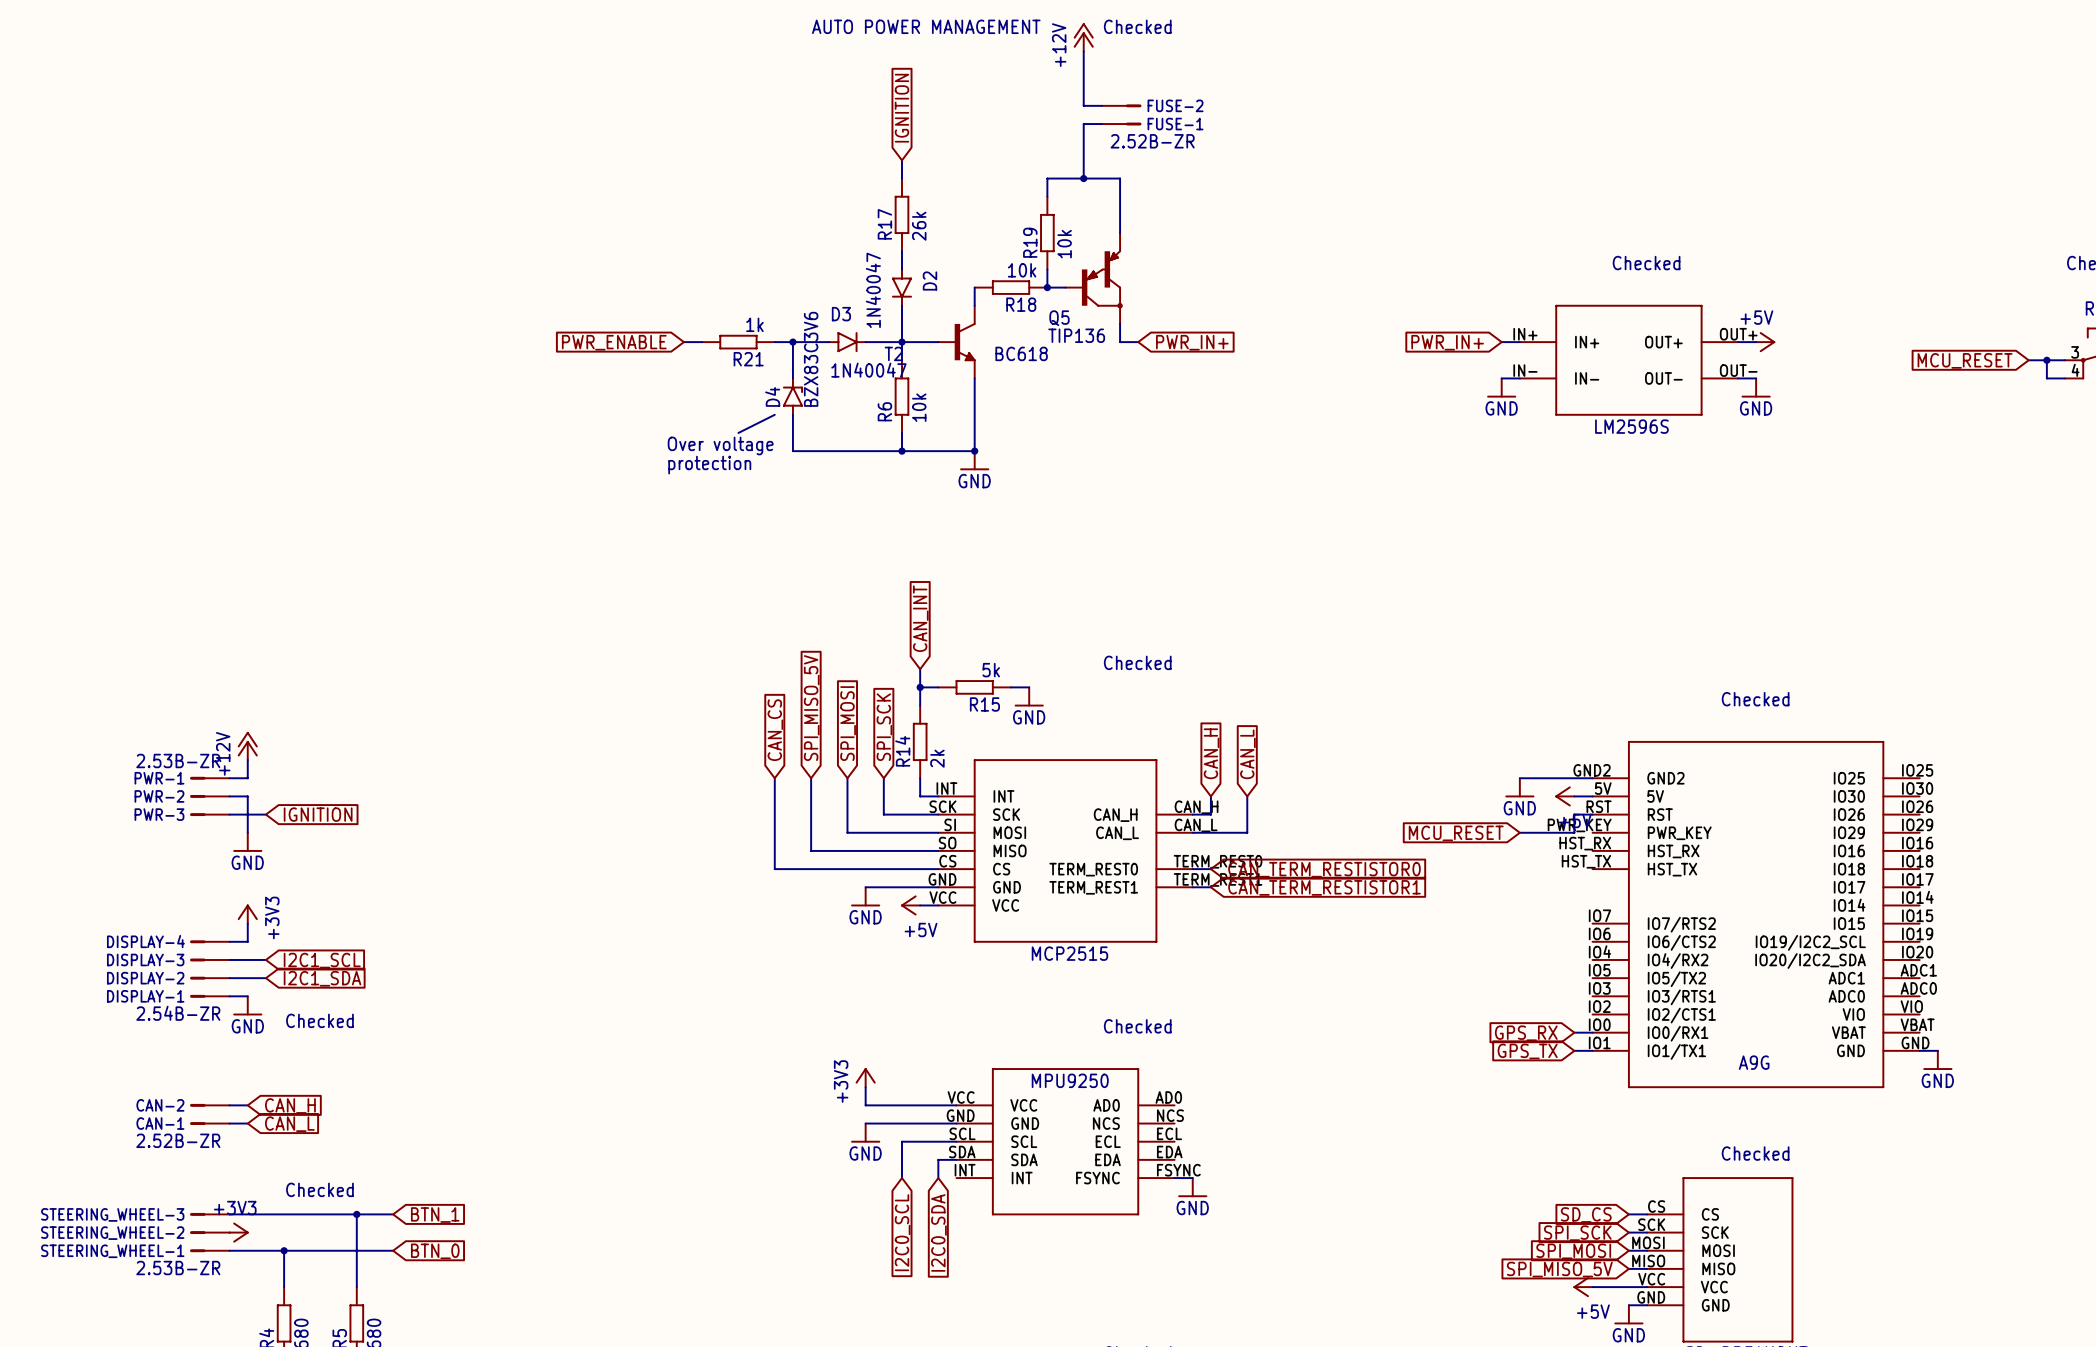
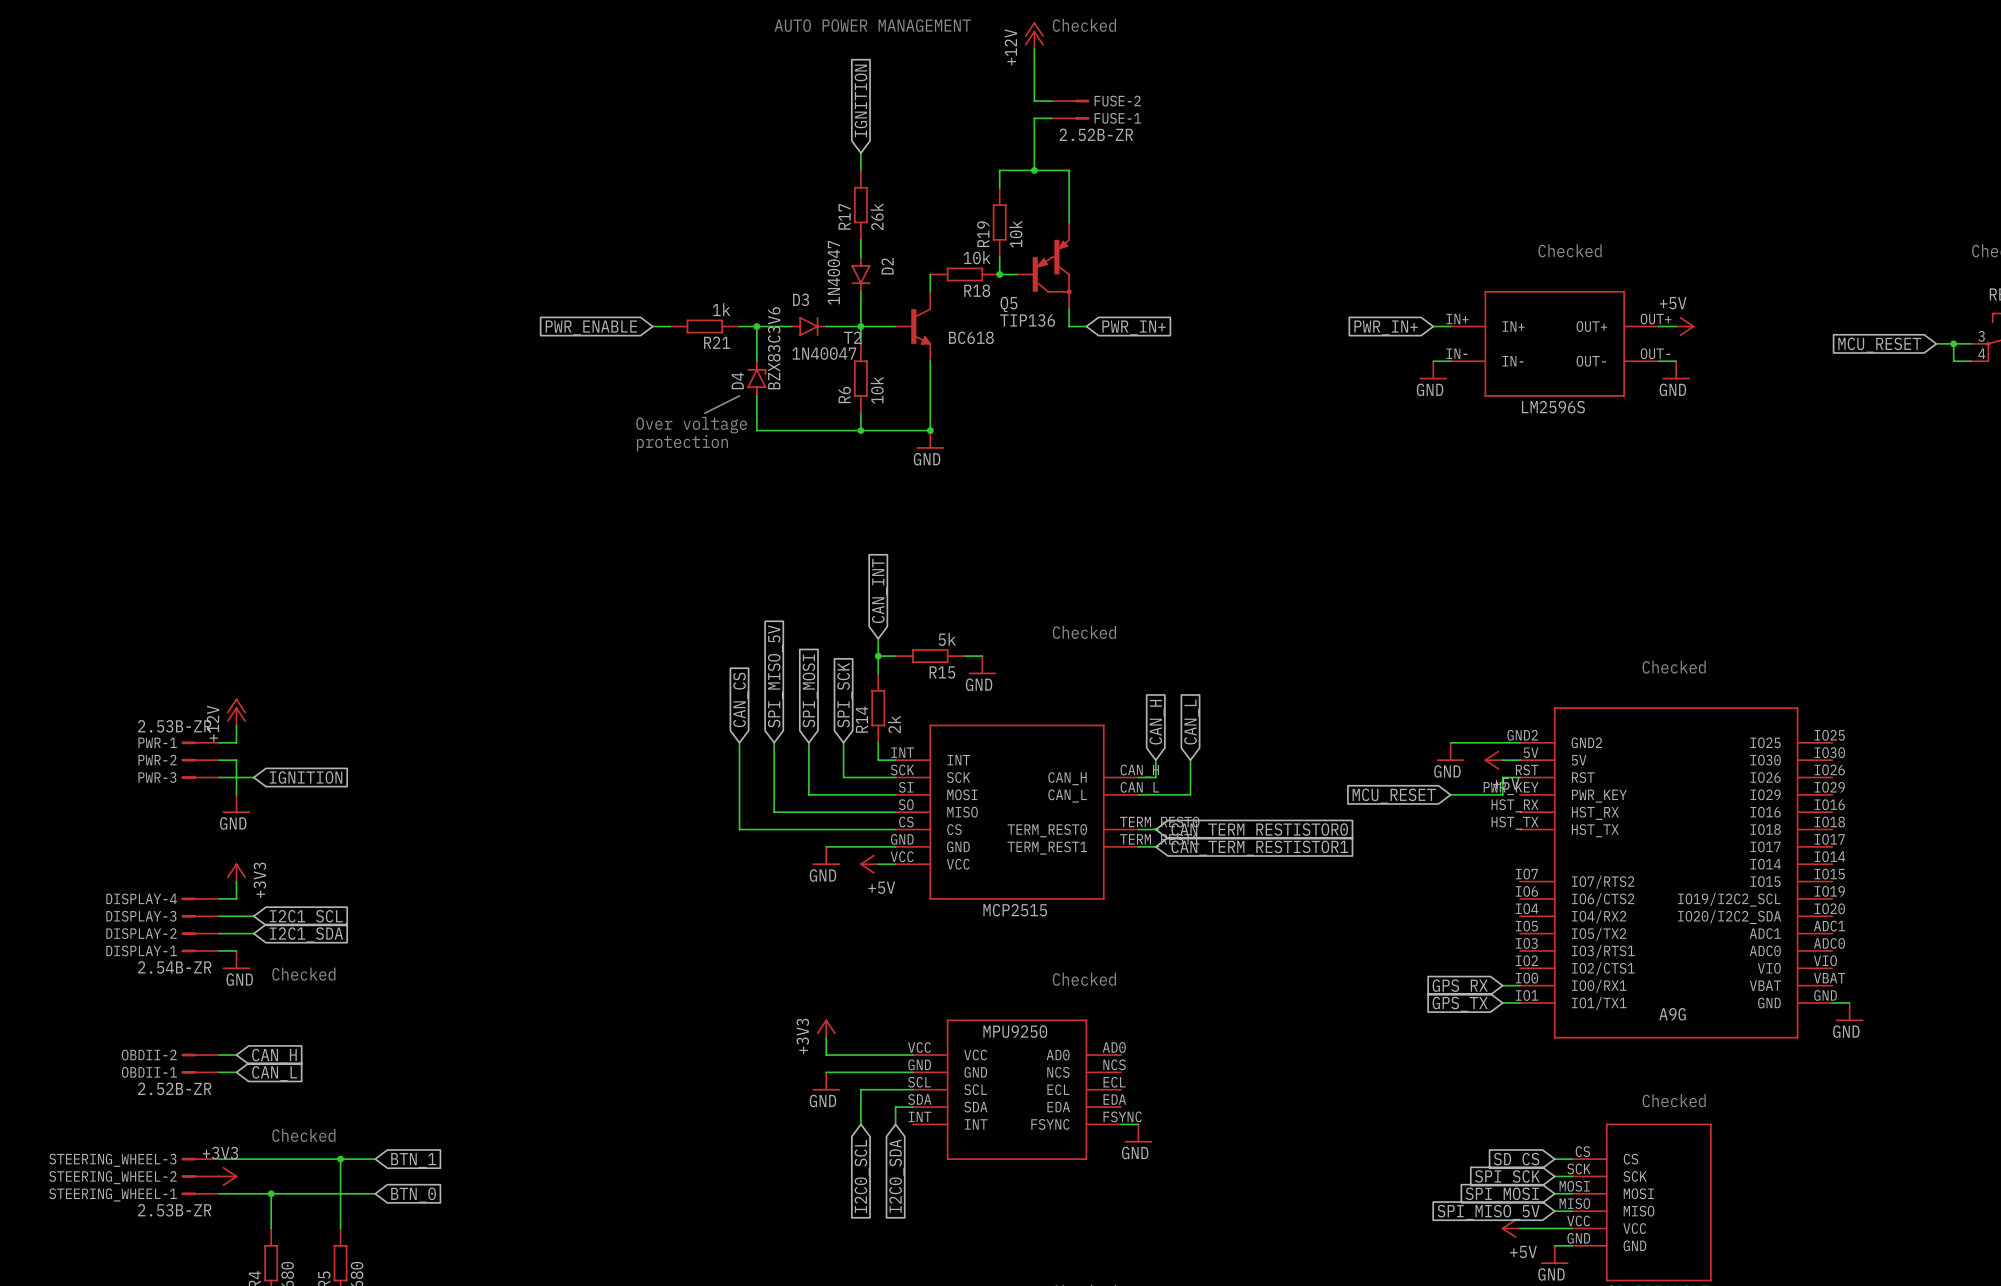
CAN-2 name: CAN-2 (160, 1105) -> OBDII-2 (149, 1055)
CAN-1 name: CAN-1 (160, 1123) -> OBDII-1 (149, 1072)

